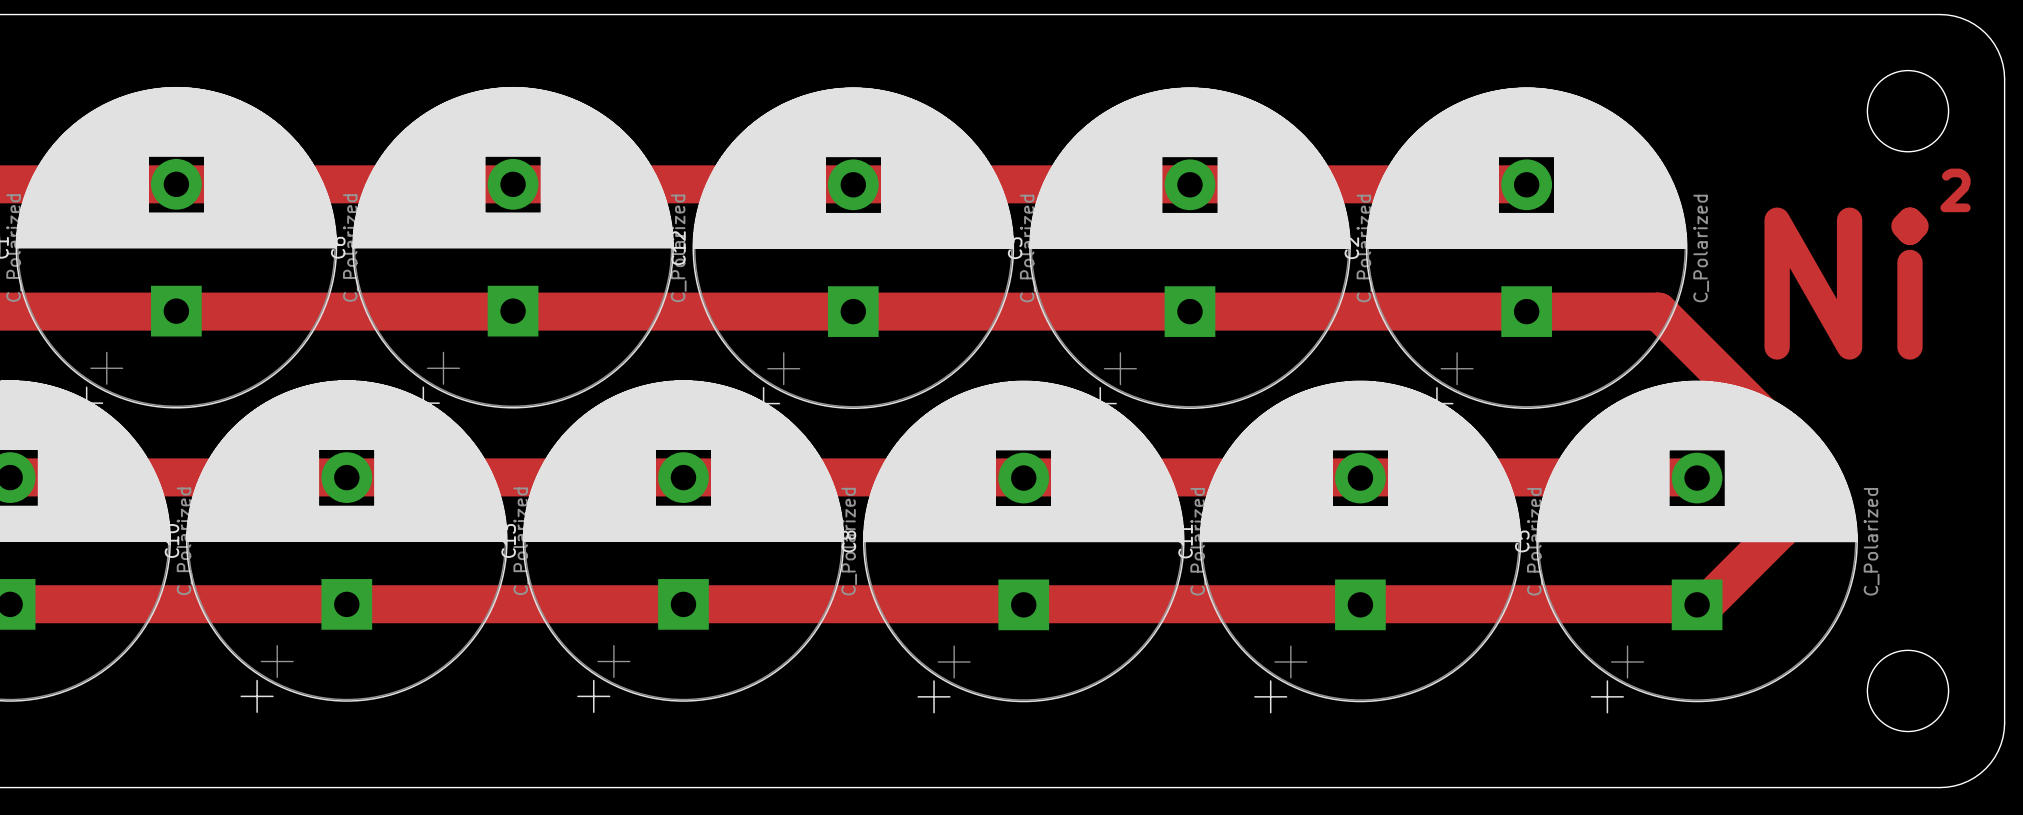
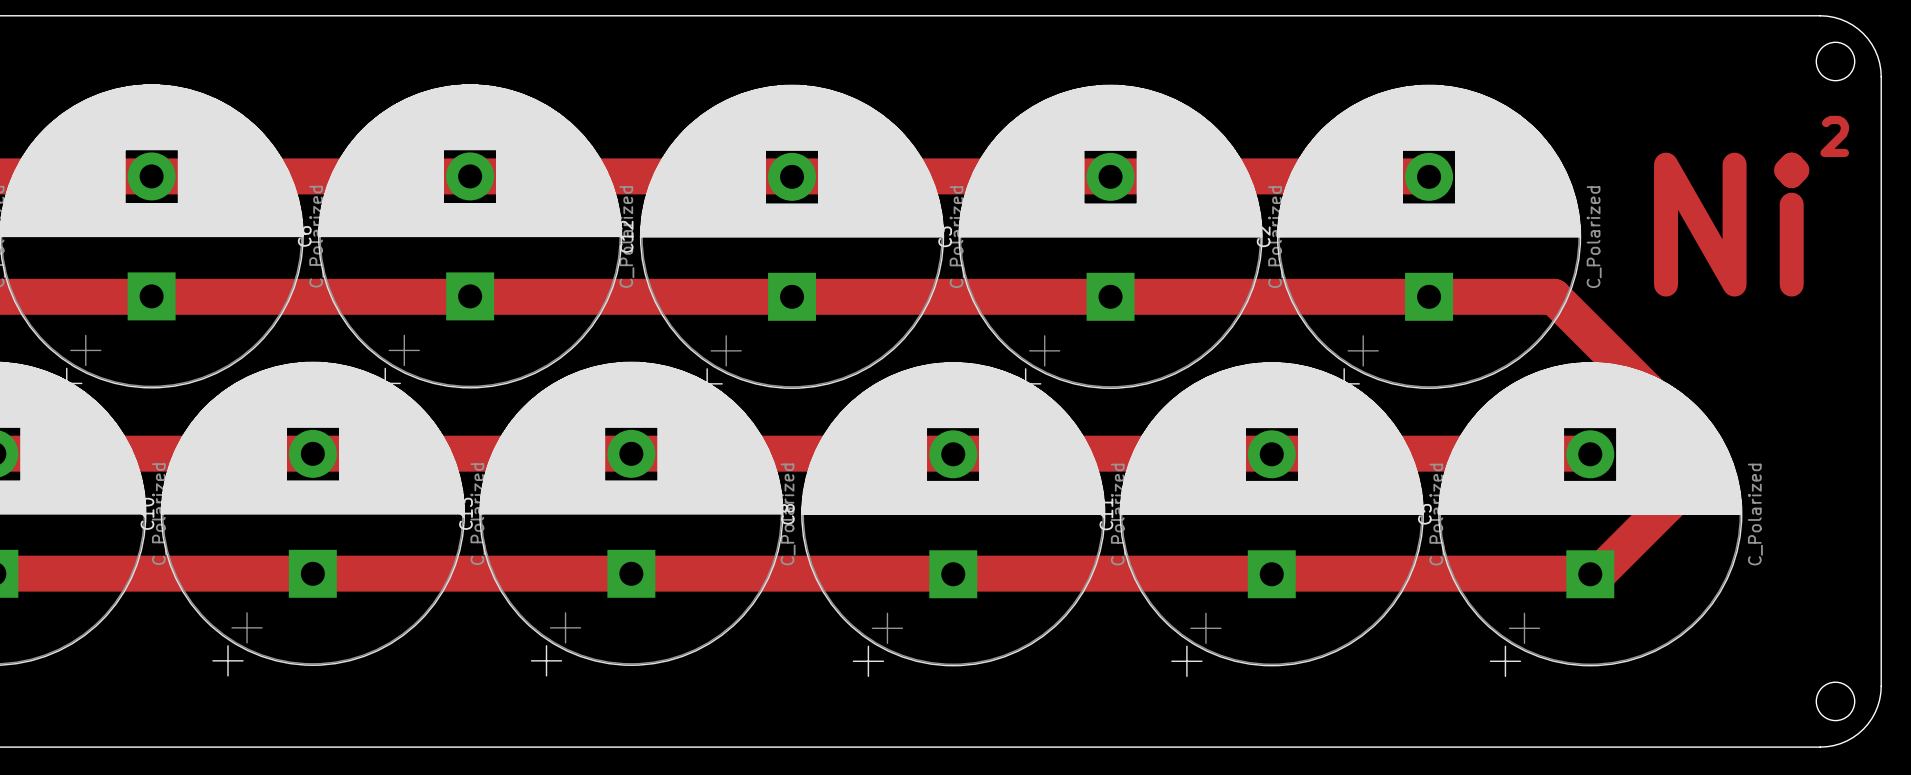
round board edge: none -> [1815, 41, 1856, 82]
round board edge: [1866, 69, 1950, 153] -> none
text position: 2 (1955, 190) -> 2 (1834, 136)
text position: Ni (1846, 283) -> Ni (1731, 224)
round board edge: [1866, 649, 1950, 733] -> none
round board edge: none -> [1815, 681, 1856, 722]

